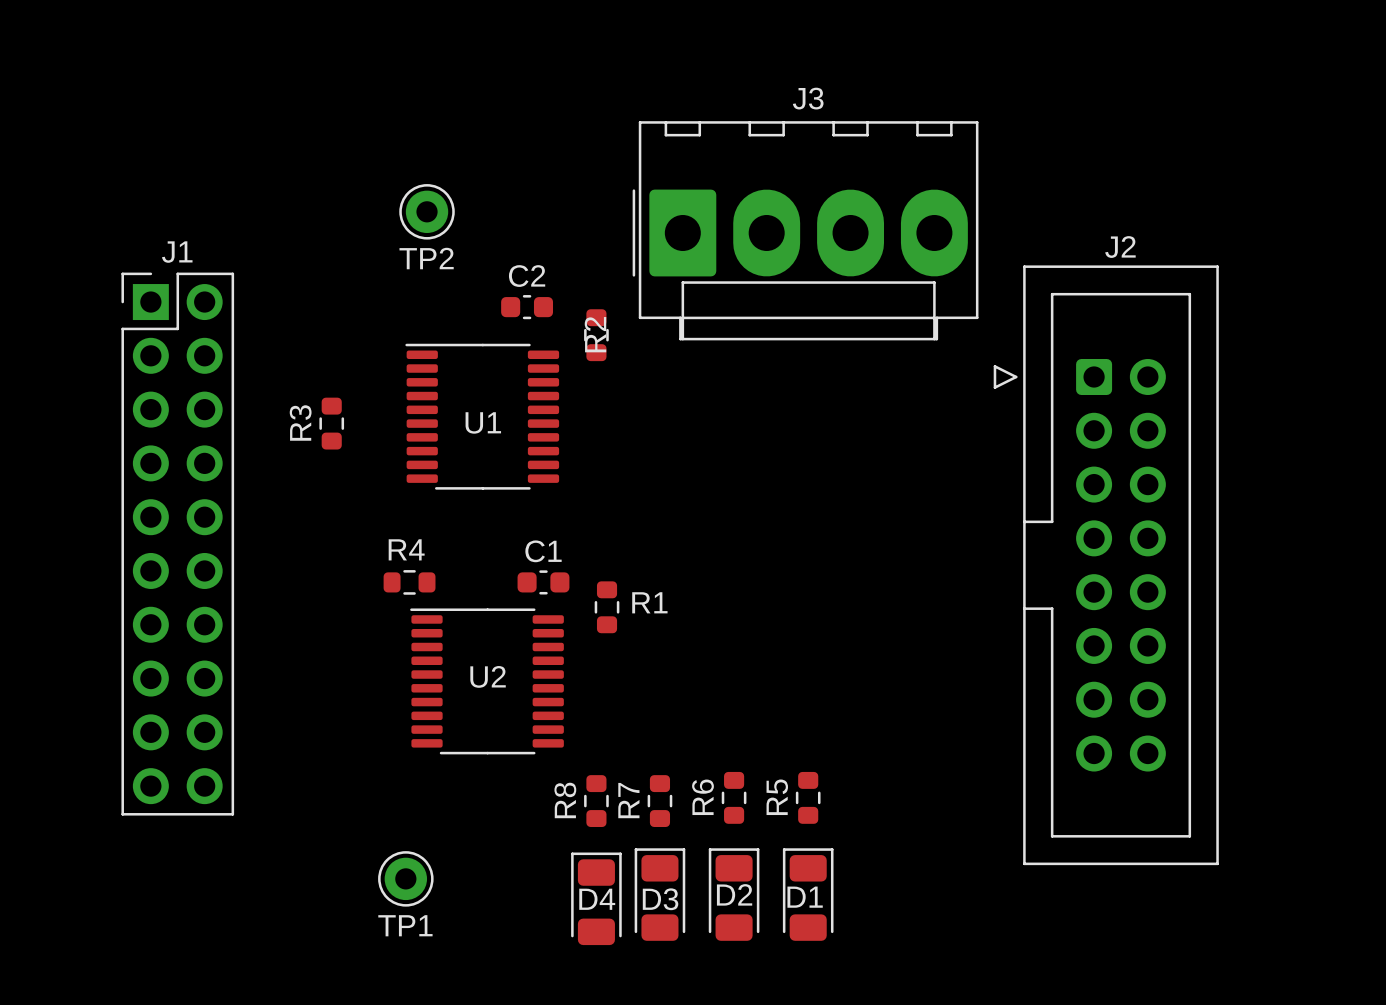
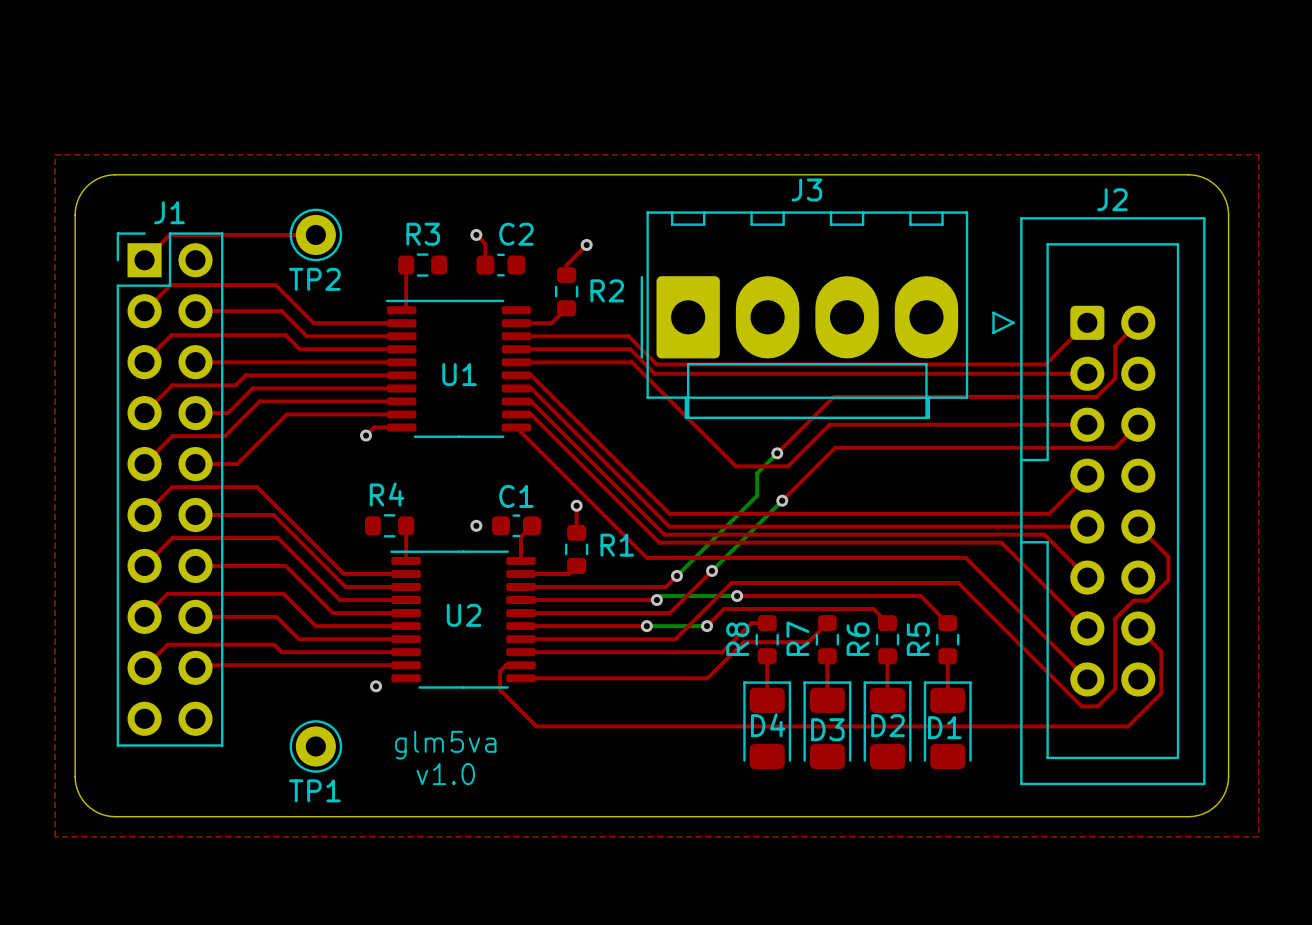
top zone outline: none -> (55, 154) (1258, 154) (1258, 836) (55, 836) (55, 154)
board edge: none -> (115, 174) (1188, 174) (1201, 177) (1209, 180) (1222, 193) (1226, 201) (1228, 214) (1228, 776) (1227, 785) (1222, 797) (1216, 804) (1205, 812) (1188, 816) (115, 816) (106, 815) (93, 810) (83, 801) (79, 793) (75, 776) (75, 214) (77, 201) (86, 186) (97, 178) (115, 174)
TP2 position: (427, 211) -> (315, 234)
J3 position: (805, 230) -> (804, 315)
top track: none -> (315, 234) (169, 234) (144, 260)
top track: none -> (476, 234) (485, 243) (485, 265)
via: none -> (476, 234)
C2 name position: C2 (527, 276) -> C2 (516, 234)
top track: none -> (586, 244) (566, 265) (566, 275)
via: none -> (586, 244)
top track: none -> (406, 265) (406, 305) (401, 310)
R2 name rotation: 0° (595, 334) -> 90° clockwise (607, 290)
top track: none -> (566, 308) (551, 323) (516, 323)
top track: none -> (144, 311) (170, 285) (275, 285) (313, 323) (401, 323)
top track: none -> (195, 311) (281, 311) (306, 336) (401, 336)
top track: none -> (1087, 322) (1045, 364) (656, 364) (628, 336) (516, 336)
top track: none -> (1138, 322) (1115, 345) (1115, 378) (1096, 396) (833, 396) (777, 453)
top track: none -> (401, 349) (299, 349) (285, 335) (171, 335) (144, 362)
top track: none -> (516, 349) (630, 349) (654, 373) (1087, 373)
top track: none -> (195, 362) (401, 362)
top track: none -> (516, 362) (631, 362) (736, 466) (787, 466) (829, 424) (1087, 424)
R3 rotation: 0° (331, 423) -> 90° clockwise (422, 265)
R3 position: (331, 423) -> (422, 265)
top track: none -> (401, 375) (245, 375) (235, 385) (172, 385) (144, 413)
top track: none -> (516, 375) (531, 375) (669, 513) (1049, 513) (1087, 475)
top track: none -> (401, 388) (252, 388) (228, 413) (195, 413)
top track: none -> (516, 388) (531, 388) (669, 526) (1087, 526)
top track: none -> (401, 401) (259, 401) (224, 436) (172, 436) (144, 464)
top track: none -> (516, 401) (531, 401) (664, 534) (1044, 534) (1087, 577)
top track: none -> (401, 414) (286, 414) (237, 464) (195, 464)
top track: none -> (516, 414) (531, 414) (659, 542) (1001, 542) (1087, 628)
top track: none -> (1138, 424) (1115, 447) (835, 447) (782, 500)
top track: none -> (401, 427) (374, 427) (366, 435)
top track: none -> (516, 427) (646, 557) (965, 557) (1087, 679)
via: none -> (366, 435)
bottom track: none -> (777, 453) (757, 473) (757, 495) (676, 575)
via: none -> (777, 453)
bottom track: none -> (782, 500) (712, 570)
via: none -> (782, 500)
top track: none -> (576, 505) (576, 532)
via: none -> (576, 505)
J2 position: (1106, 565) -> (1098, 501)
top track: none -> (144, 514) (172, 487) (257, 487) (343, 573) (406, 573)
top track: none -> (195, 514) (273, 514) (345, 587) (406, 587)
top track: none -> (406, 525) (406, 560)
via: none -> (476, 525)
top track: none -> (532, 525) (520, 536) (520, 560)
top track: none -> (1138, 526) (1168, 556) (1168, 580) (1147, 600) (1133, 600) (1115, 618) (1115, 689) (1097, 706) (1081, 706) (958, 582) (731, 582) (675, 639) (520, 639)
top track: none -> (144, 565) (172, 538) (277, 538) (339, 600) (406, 600)
top track: none -> (195, 565) (285, 565) (332, 613) (406, 613)
top track: none -> (576, 565) (568, 573) (520, 573)
top track: none -> (712, 570) (669, 613) (520, 613)
via: none -> (712, 570)
top track: none -> (676, 575) (665, 587) (520, 587)
via: none -> (676, 575)
top track: none -> (737, 596) (920, 596) (947, 623)
bottom track: none -> (737, 596) (660, 596) (656, 600)
via: none -> (737, 596)
top track: none -> (520, 600) (656, 600)
via: none -> (656, 600)
top track: none -> (144, 616) (167, 593) (283, 593) (315, 626) (406, 626)
top track: none -> (195, 616) (276, 616) (298, 639) (406, 639)
top track: none -> (767, 623) (751, 623) (722, 652) (520, 652)
top track: none -> (827, 623) (808, 642) (743, 642) (707, 678) (520, 678)
top track: none -> (887, 623) (873, 609) (724, 609) (707, 626)
top track: none -> (520, 626) (646, 626)
bottom track: none -> (646, 626) (707, 626)
via: none -> (646, 626)
via: none -> (707, 626)
top track: none -> (1138, 628) (1161, 651) (1161, 693) (1128, 726) (536, 726) (500, 690) (500, 671) (506, 665) (520, 665)
top track: none -> (406, 652) (281, 652) (274, 644) (167, 644) (144, 667)
top track: none -> (767, 656) (767, 700)
top track: none -> (827, 656) (827, 700)
top track: none -> (887, 656) (887, 700)
top track: none -> (947, 656) (947, 700)
top track: none -> (406, 665) (198, 665) (195, 667)
via: none -> (376, 686)
R6 position: (734, 797) -> (887, 639)
R5 position: (808, 797) -> (947, 639)
R8 position: (596, 801) -> (767, 639)
R7 position: (659, 801) -> (827, 639)
text: none -> glm5va (445, 745)
text: none -> v1.0 (445, 774)
TP1 position: (405, 878) -> (315, 746)
D3 position: (659, 894) -> (827, 725)
D2 position: (734, 894) -> (887, 725)
D1 position: (808, 894) -> (947, 725)
D4 position: (596, 898) -> (767, 725)

